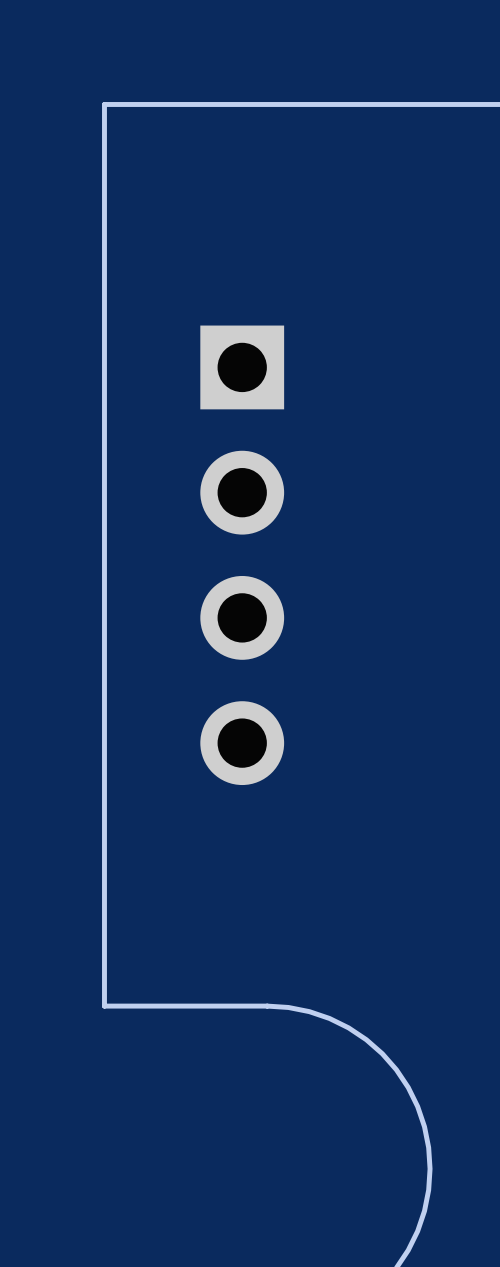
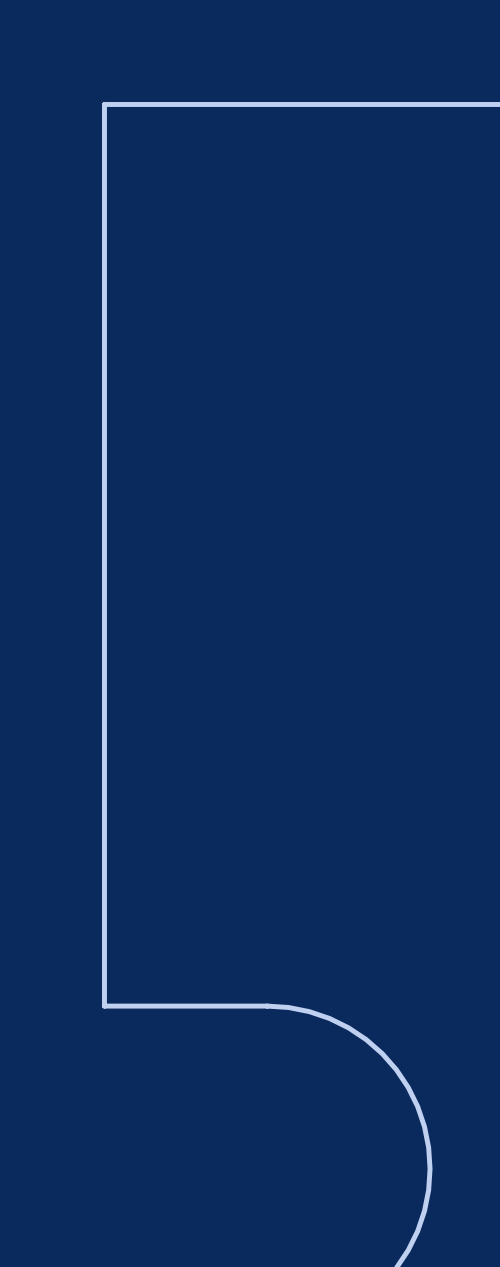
part: (242, 555) -> none

